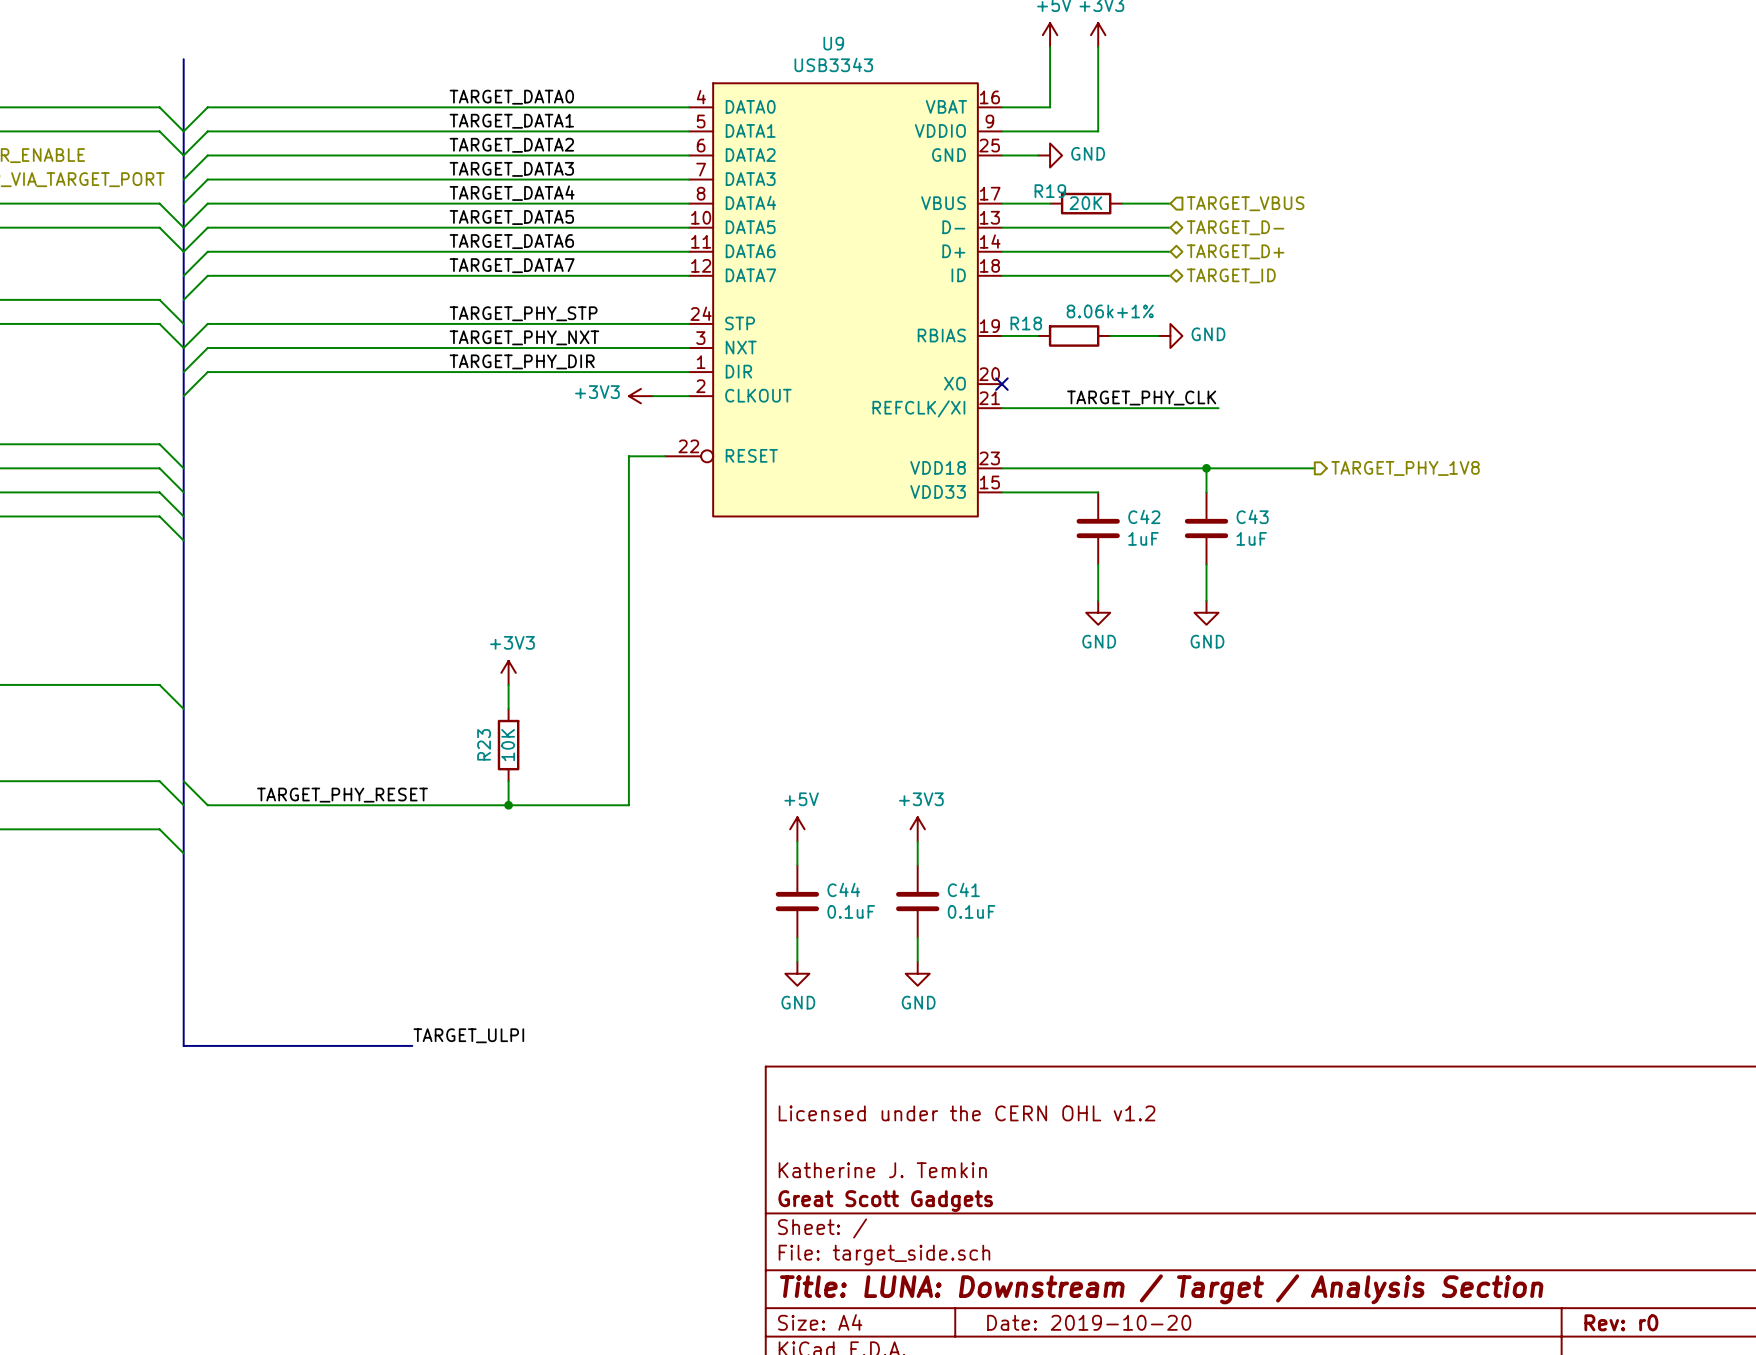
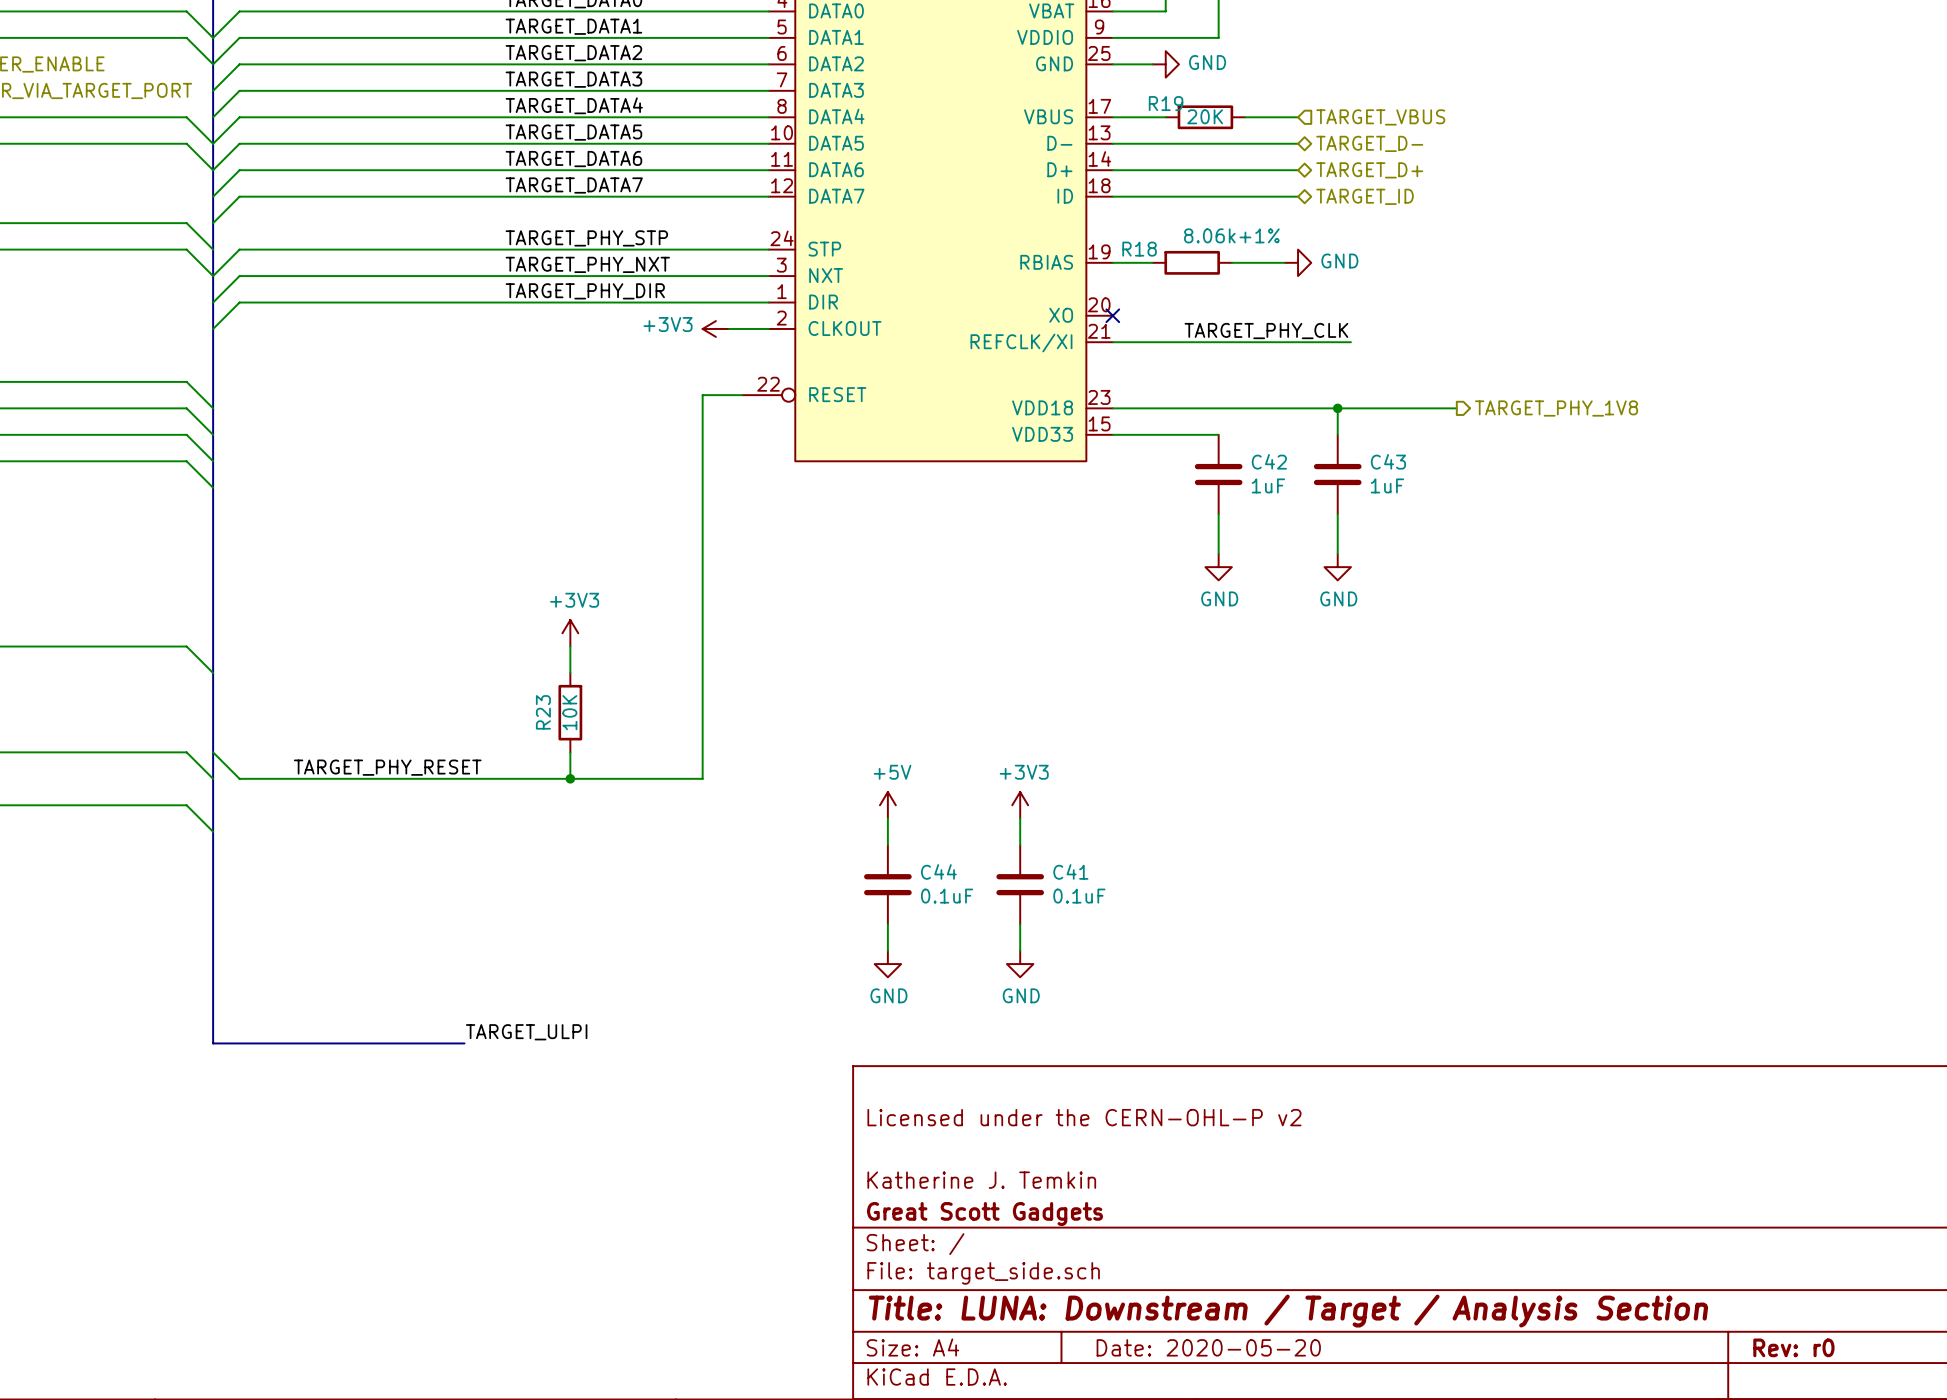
title block: Licensed under the CERN OHL v1.2 (967, 1113) -> Licensed under the CERN-OHL-P v2 (1084, 1117)
title block: Date: 2019-10-20 (1089, 1322) -> Date: 2020-05-20 (1208, 1347)

